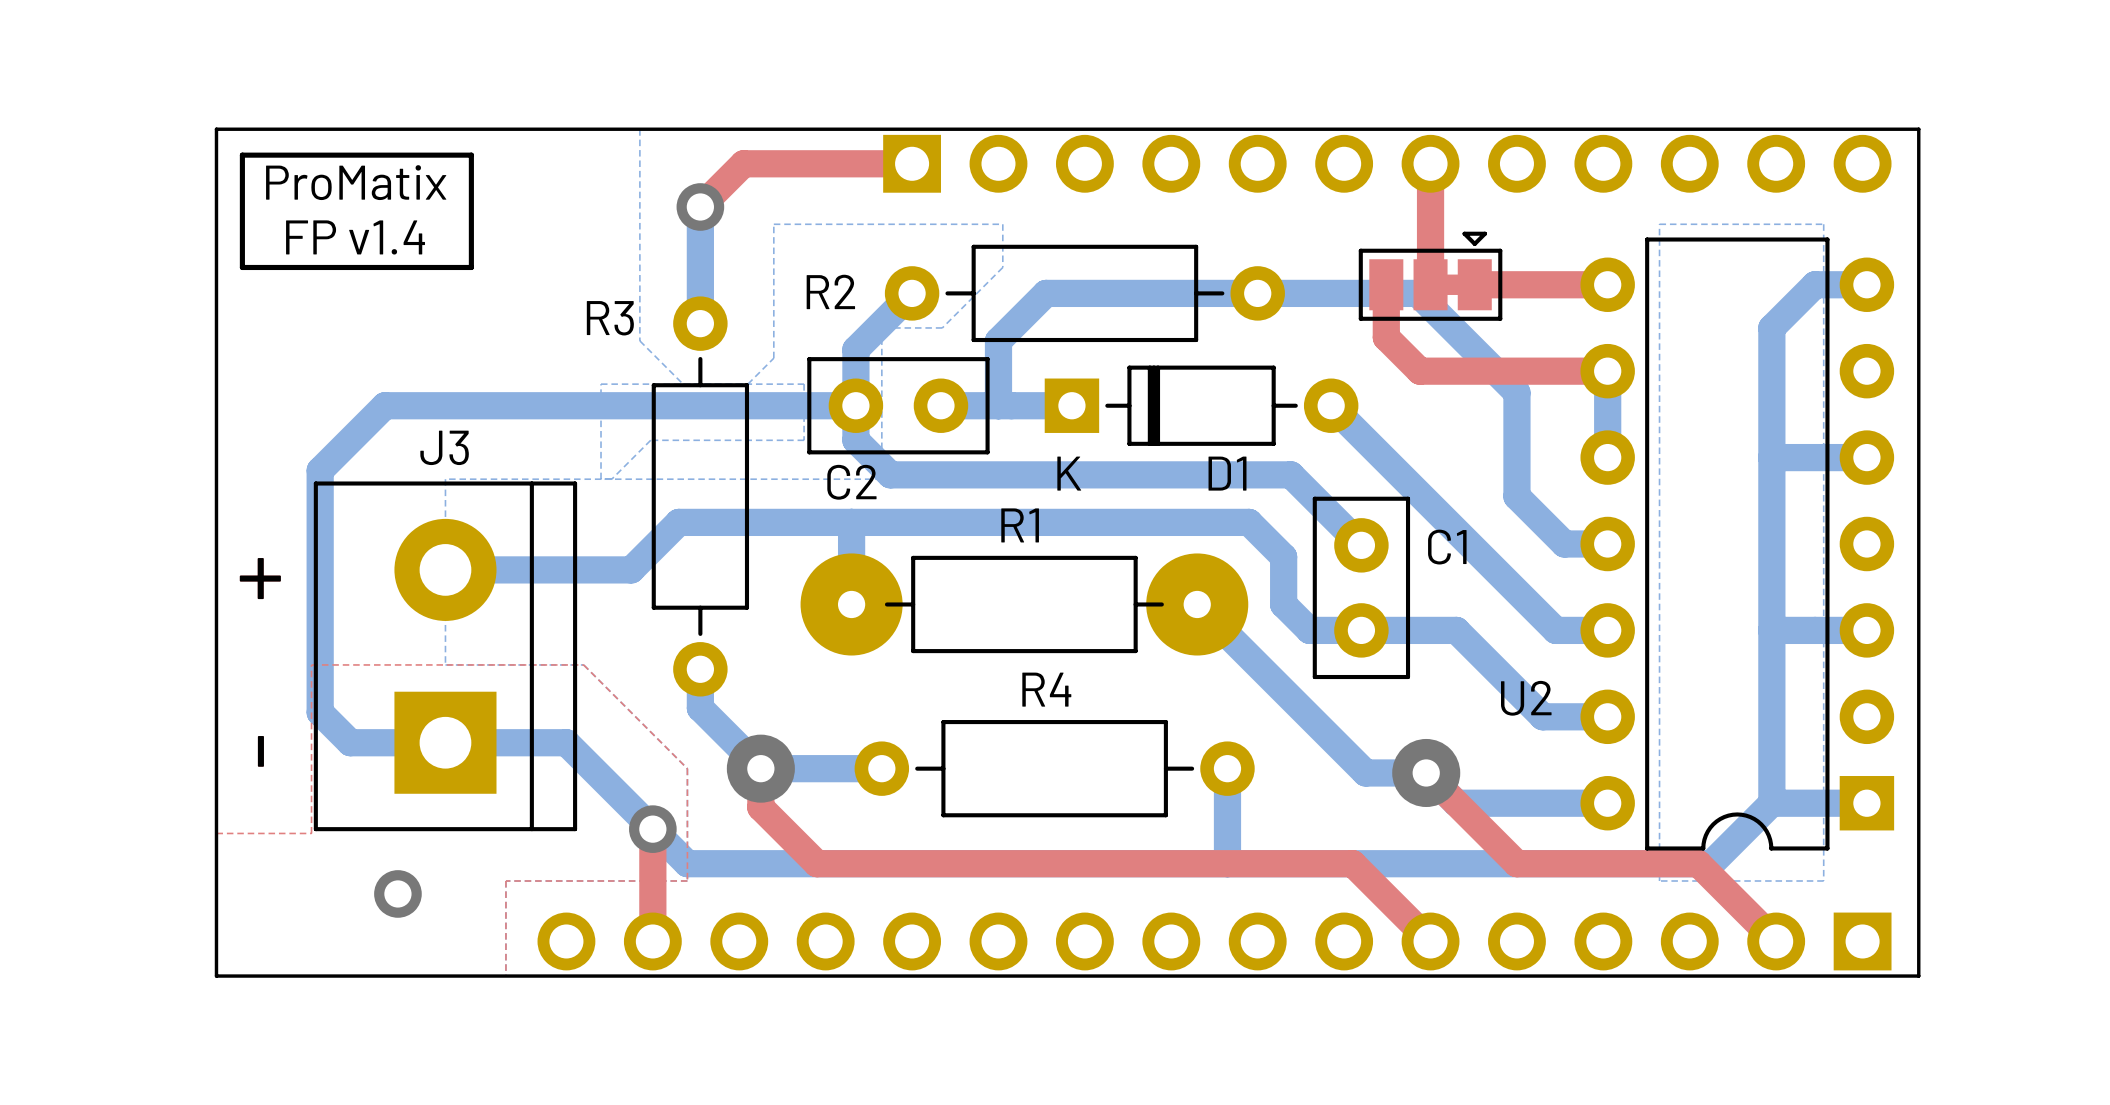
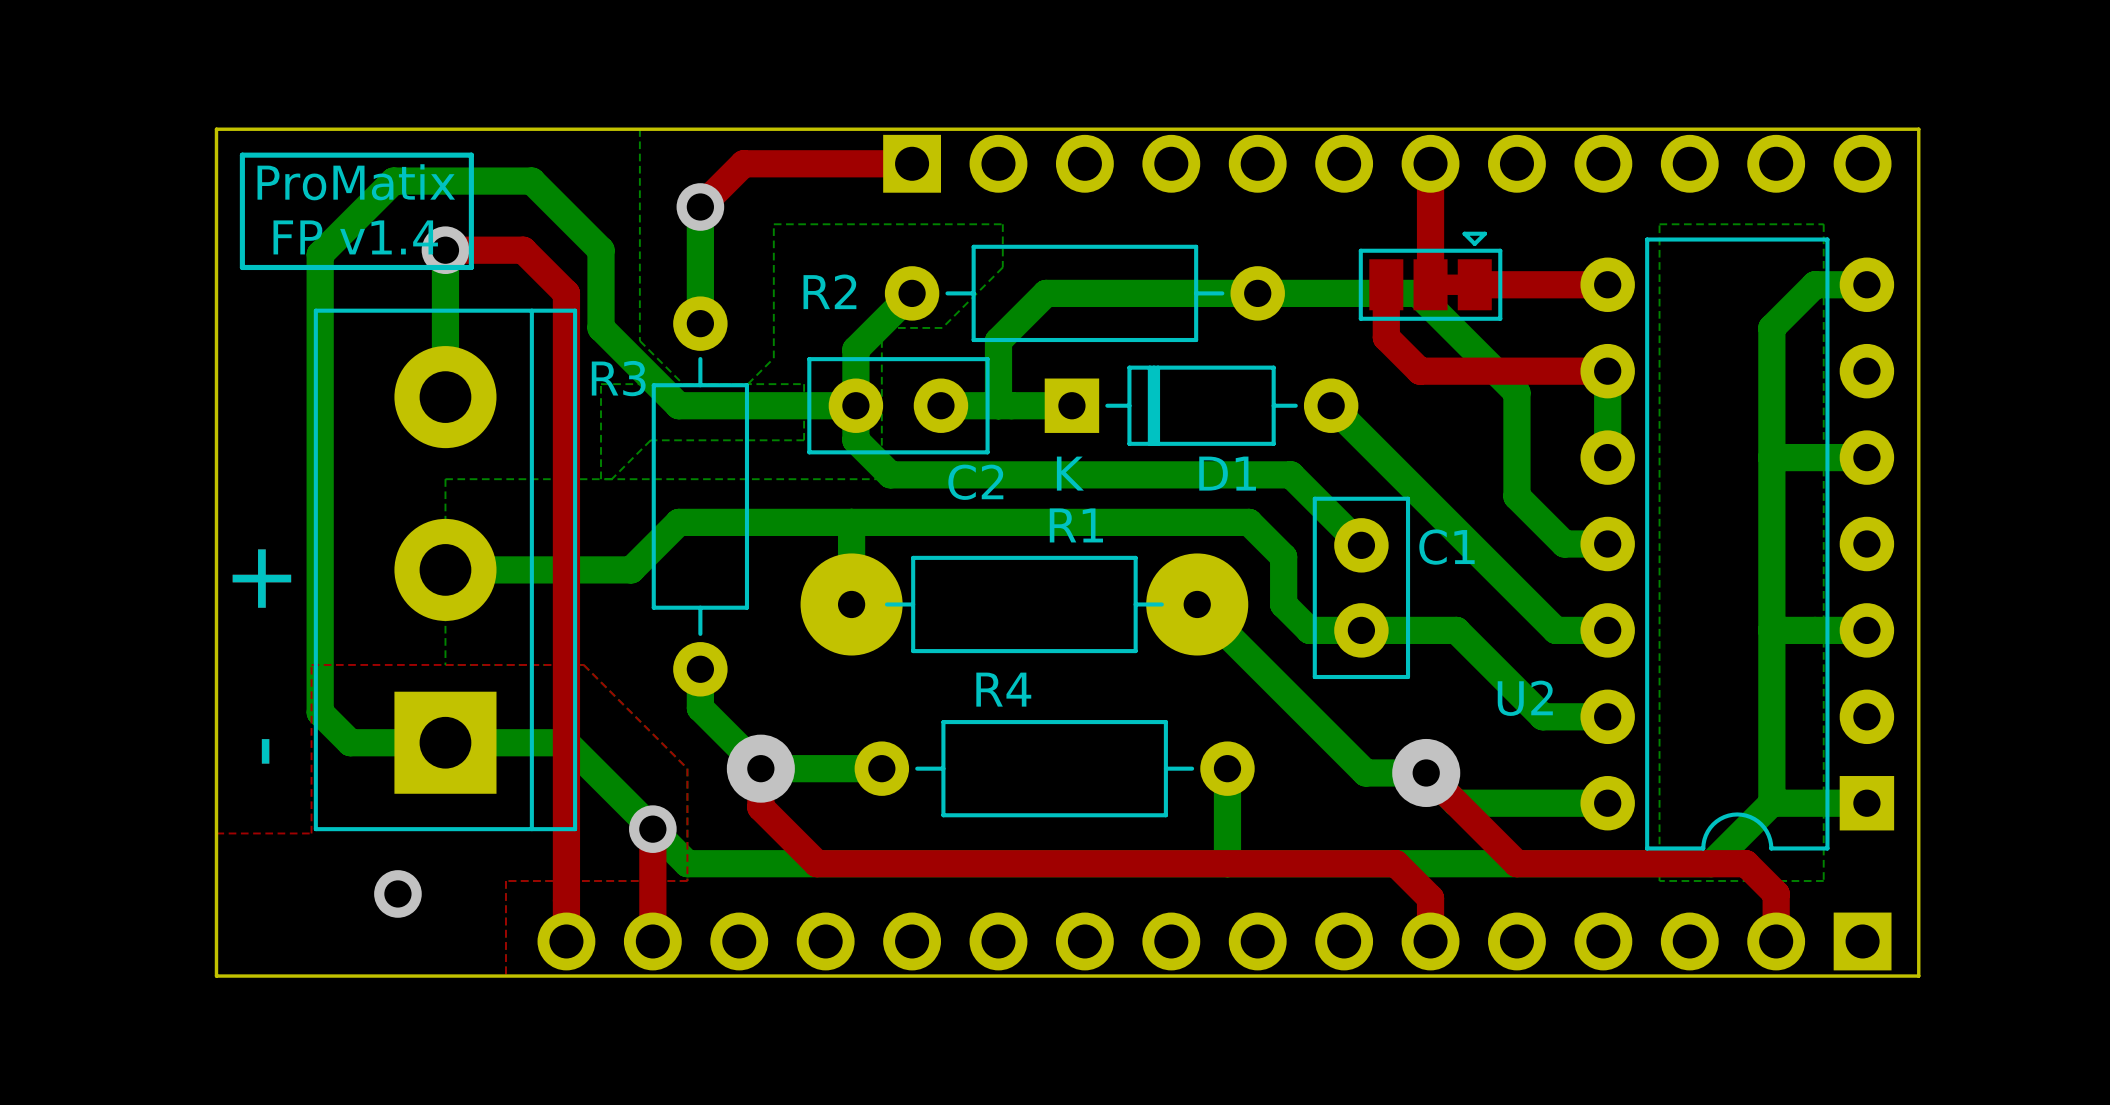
bottom track: none -> (445, 250) (445, 397)
top track: none -> (445, 250) (523, 250) (566, 293) (566, 941)
via: none -> (445, 250)
R3 name position: R3 (610, 318) -> R3 (618, 378)
bottom track: (678, 405) (384, 405) (320, 470) -> (678, 405) (601, 327) (601, 250) (531, 181) (393, 181) (320, 254) (320, 470)
C2 name position: C2 (851, 482) -> C2 (975, 482)
R1 name position: R1 (1020, 525) -> R1 (1076, 525)
part: none -> (445, 569)
J3: (445, 656) -> none
R4 name position: R4 (1046, 689) -> R4 (1003, 689)
top track: (1352, 863) (1430, 941) -> (1352, 863) (1395, 863) (1430, 898) (1430, 941)
top track: (1698, 863) (1776, 941) -> (1698, 863) (1745, 863) (1776, 893) (1776, 941)

